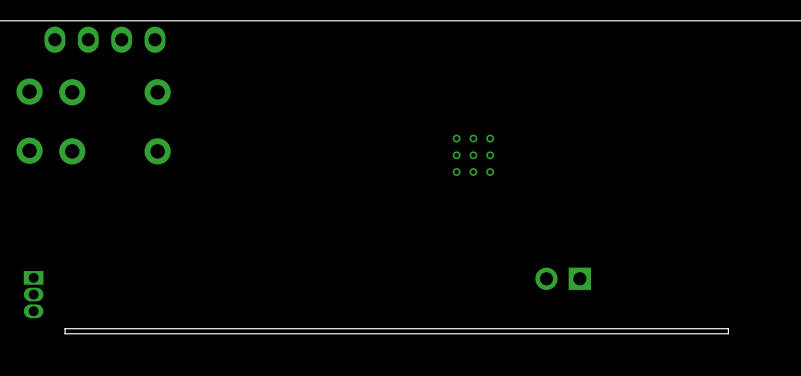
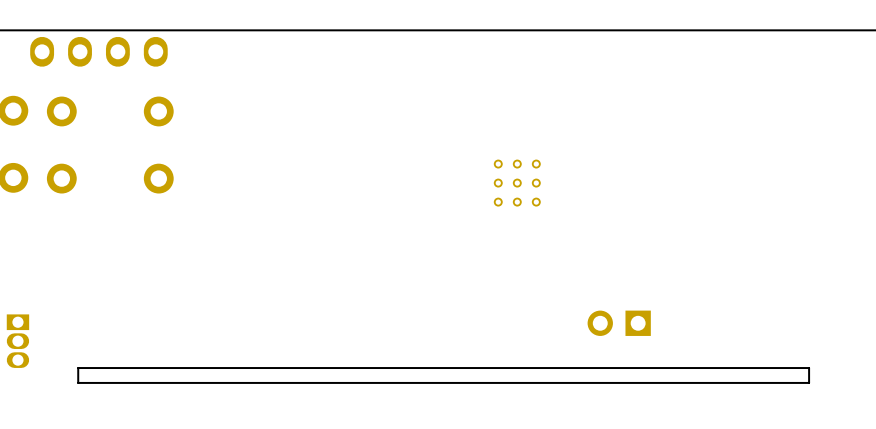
board edge: none -> (809, 368) (78, 368) (78, 382) (809, 382) (809, 368)
board edge: (728, 328) (65, 328) (65, 333) (728, 333) (728, 328) -> none

